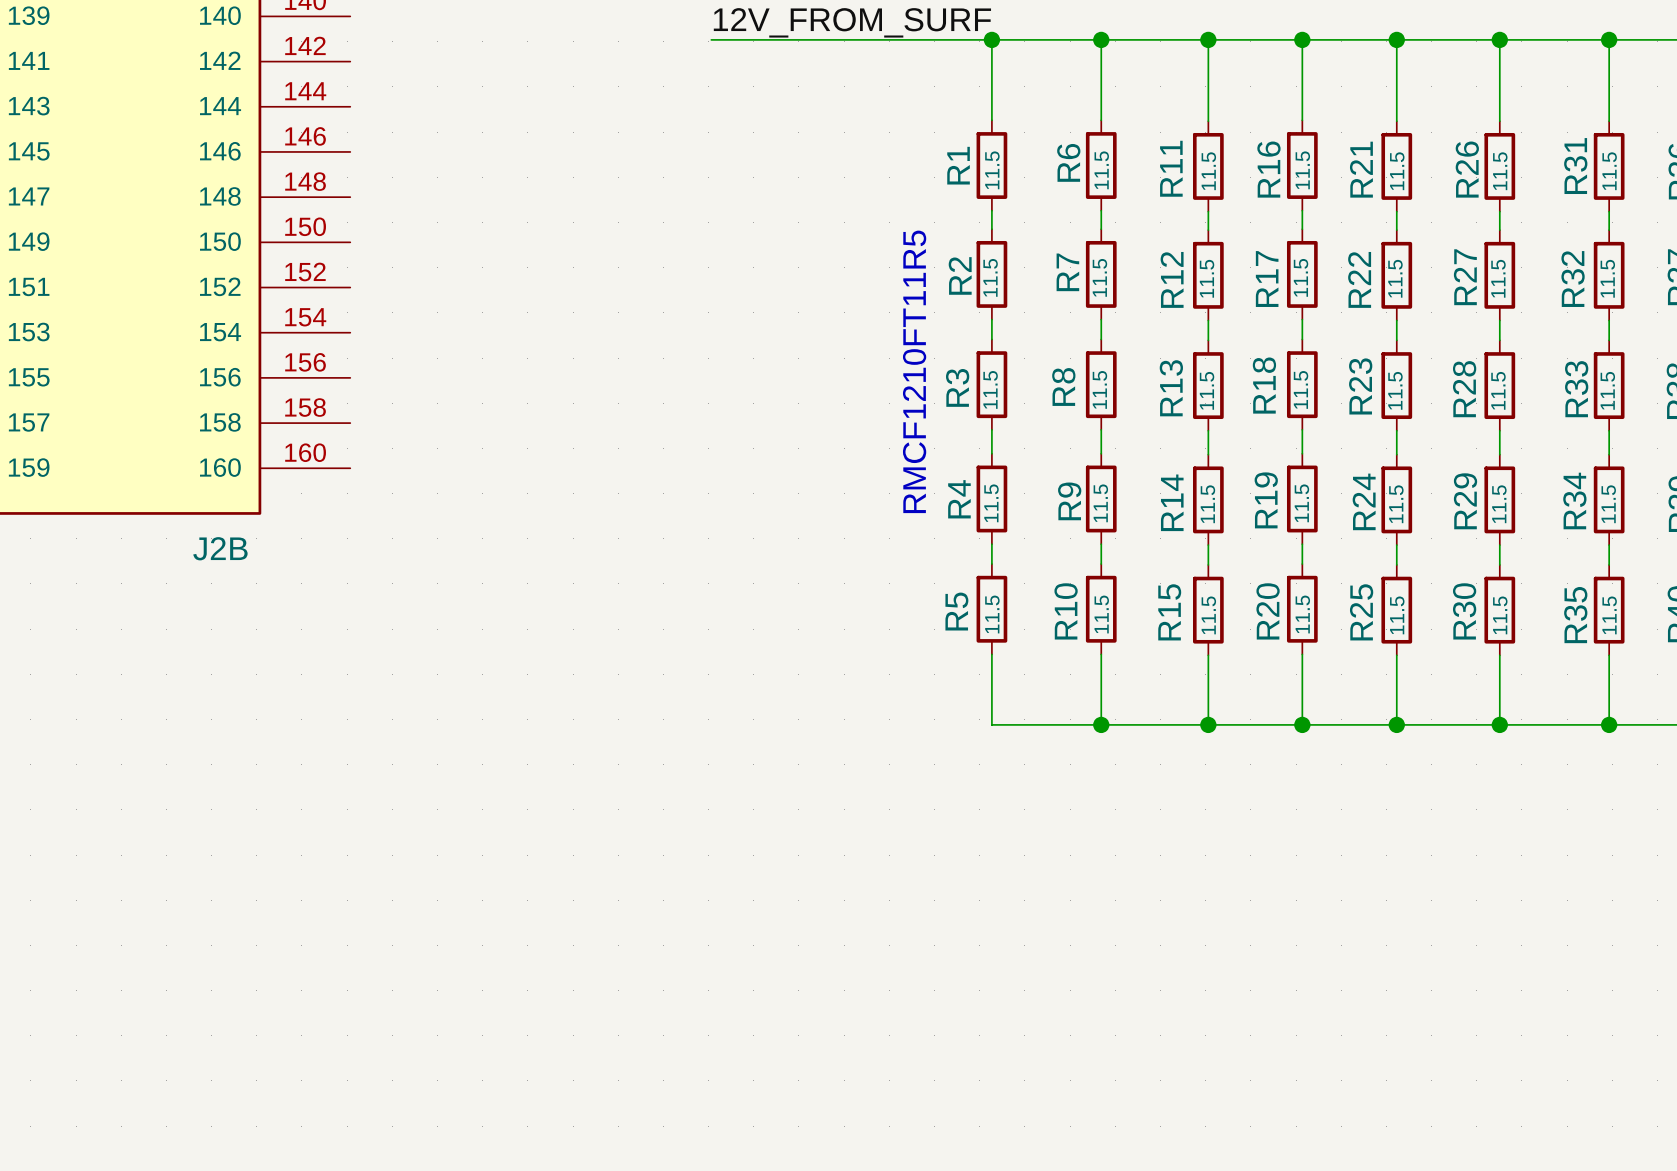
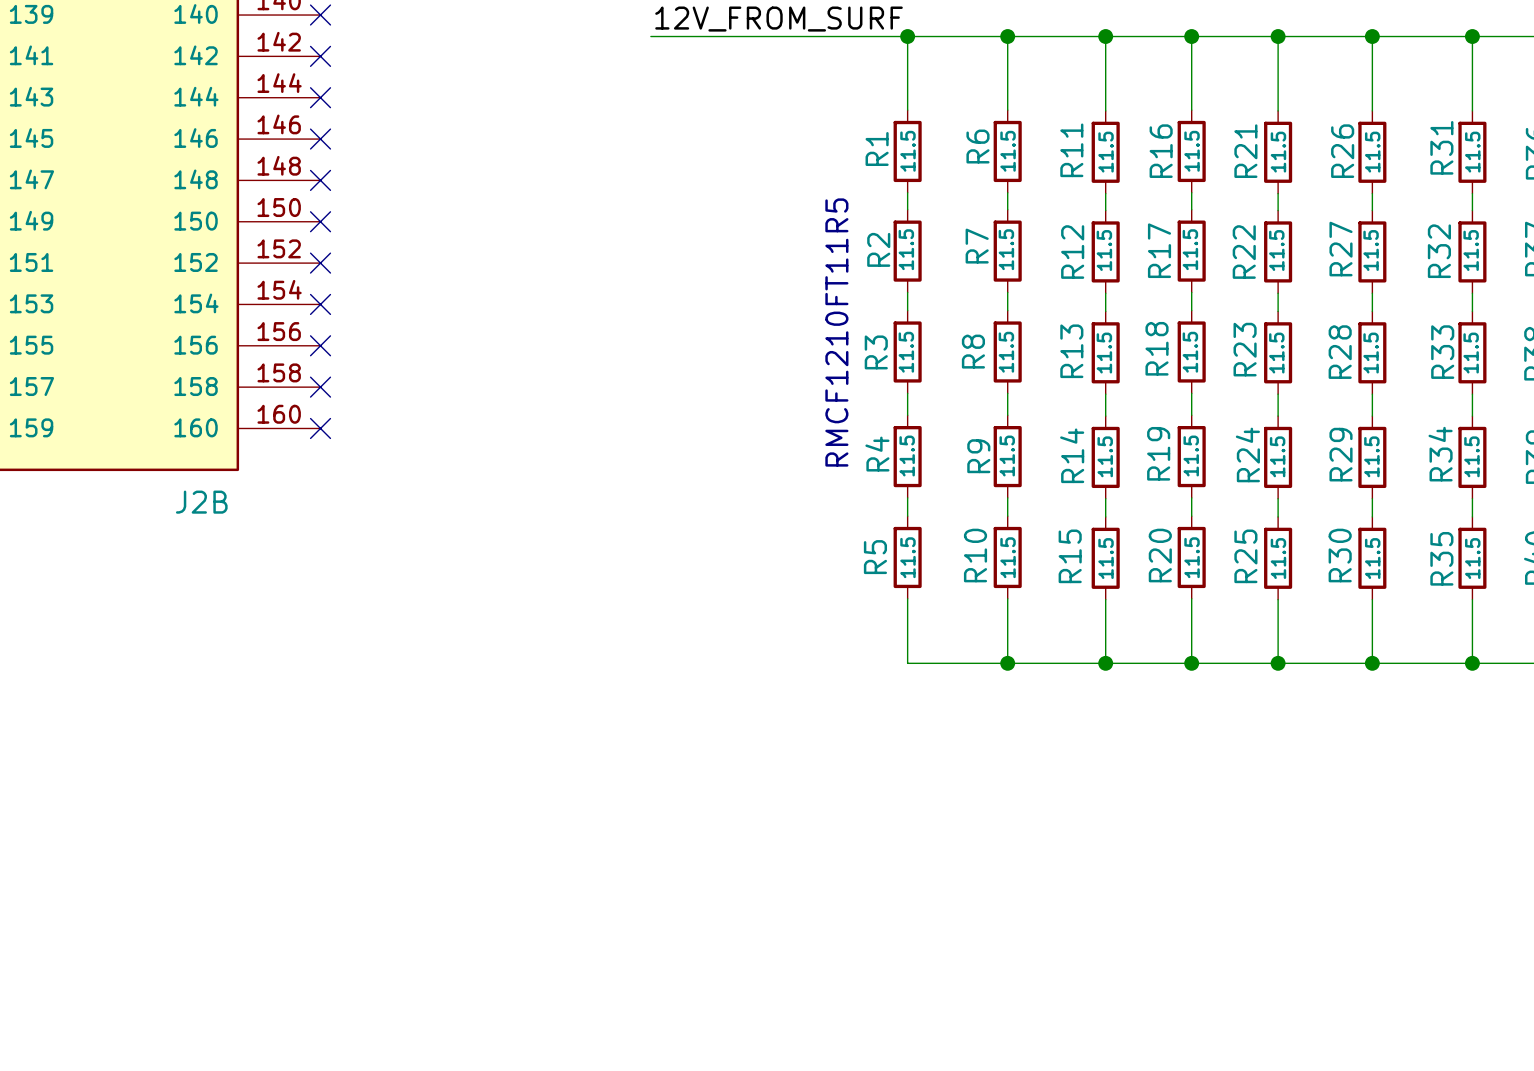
no-connect mark: none -> (320, 15)
no-connect mark: none -> (320, 56)
no-connect mark: none -> (320, 97)
no-connect mark: none -> (320, 139)
no-connect mark: none -> (320, 180)
no-connect mark: none -> (320, 221)
no-connect mark: none -> (320, 263)
no-connect mark: none -> (320, 304)
no-connect mark: none -> (320, 345)
no-connect mark: none -> (320, 387)
no-connect mark: none -> (320, 428)

